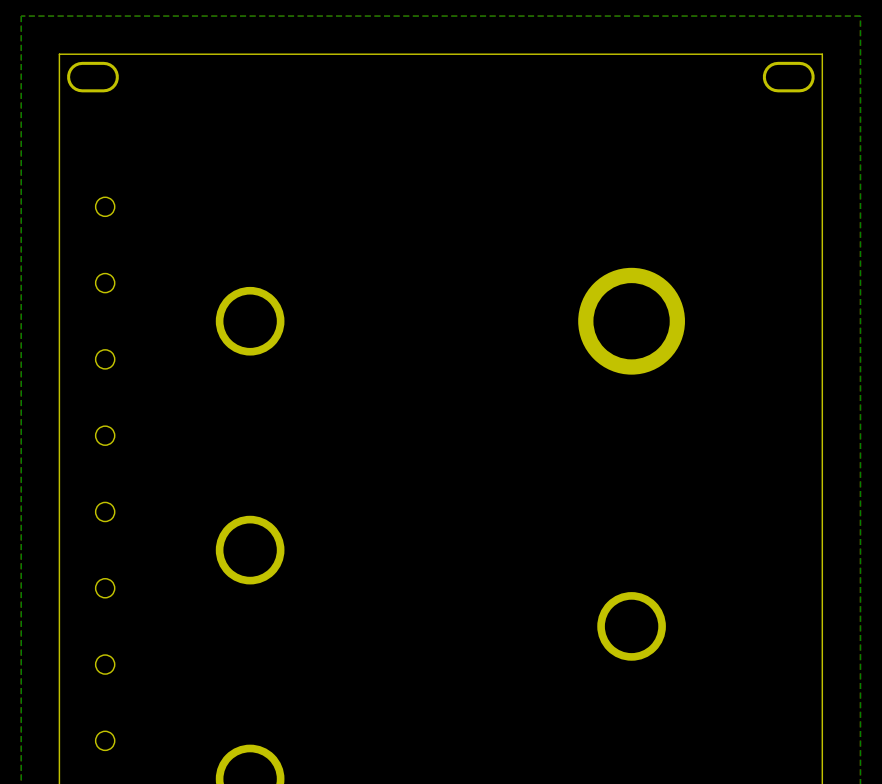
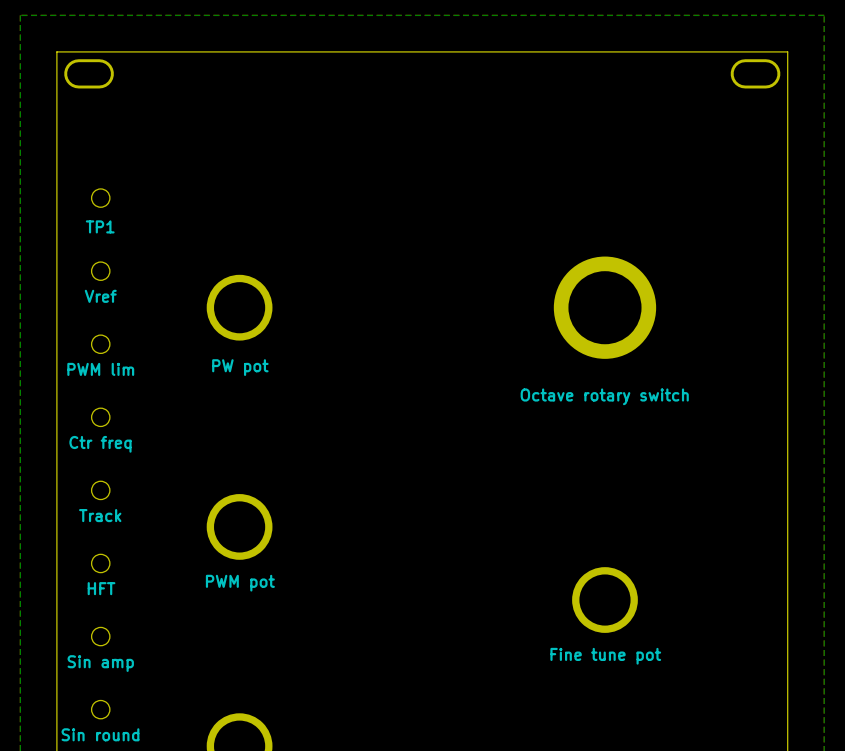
text: none -> TP1 (100, 226)
text: none -> Vref (100, 296)
text: none -> PW pot (240, 367)
text: none -> PWM lim (100, 369)
text: none -> Octave rotary switch (604, 396)
text: none -> Ctr freq (100, 444)
text: none -> Track (100, 515)
text: none -> PWM pot (240, 583)
text: none -> HFT (101, 588)
text: none -> Fine tune pot (605, 656)
text: none -> Sin amp (100, 663)
text: none -> Sin round (100, 734)

